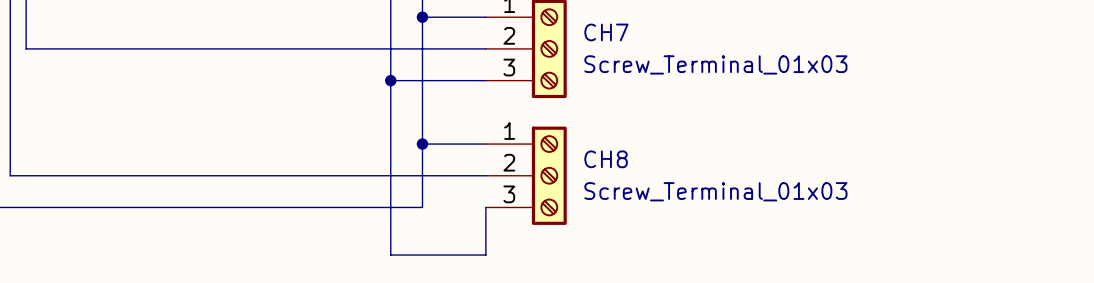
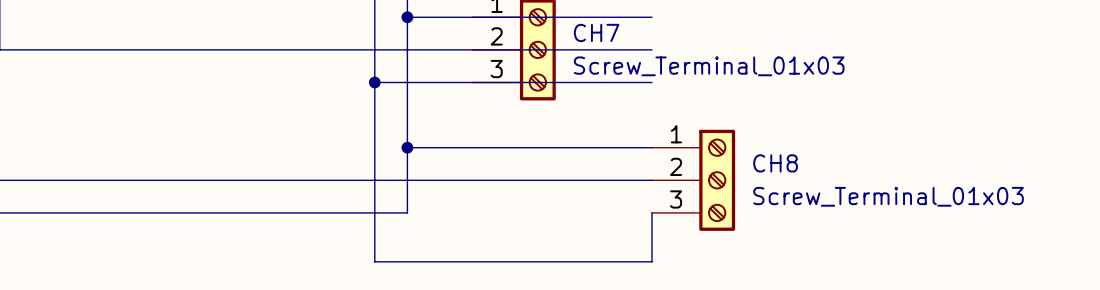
wire: none -> (472, 17) (651, 17)
wire: none -> (472, 49) (651, 49)
wire: none -> (472, 82) (651, 82)
wire: none -> (472, 147) (651, 147)
wire: none -> (472, 180) (651, 180)
CH8 position: (526, 175) -> (693, 180)
wire: (485, 207) (485, 255) -> (651, 212) (651, 261) (472, 261)

